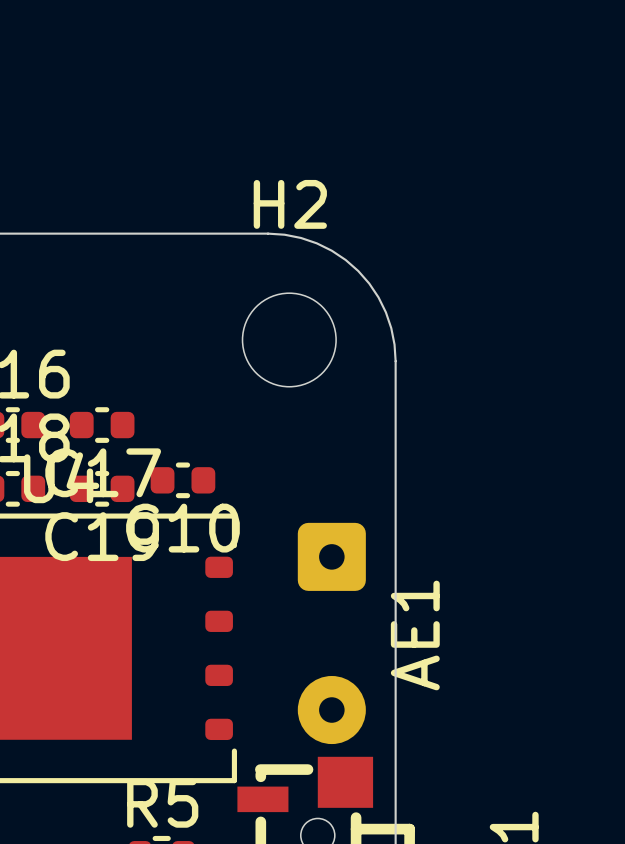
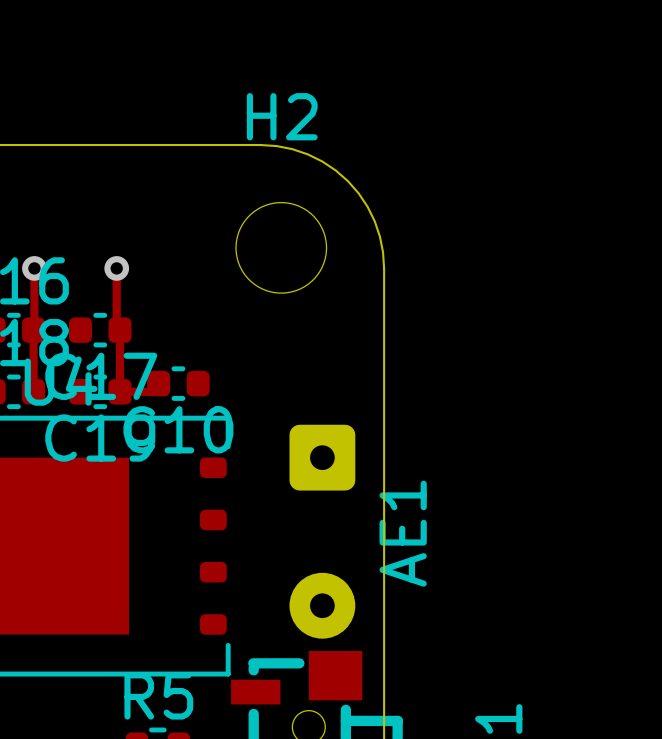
top track: none -> (34, 268) (33, 391)
via: none -> (34, 268)
top track: none -> (116, 268) (116, 326) (120, 330) (120, 391) (150, 391) (158, 383)
via: none -> (116, 268)

